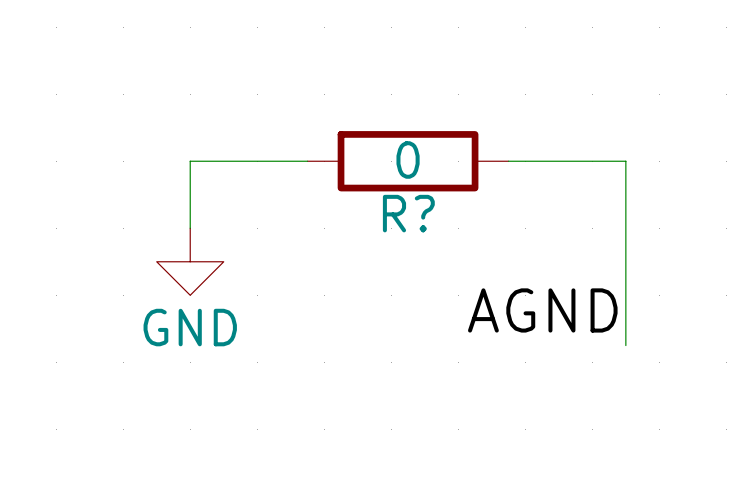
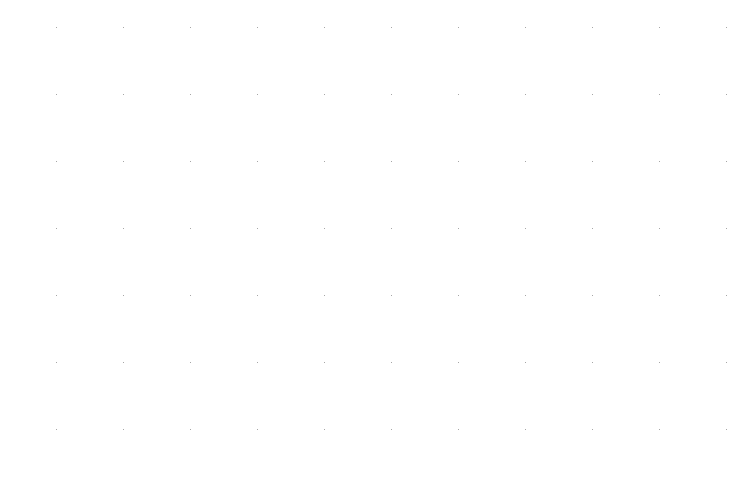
wire: (307, 161) (190, 161) (190, 228) -> none
R?: 0 (408, 161) -> none
wire: (508, 161) (625, 161) (625, 345) -> none
power symbol: GND (190, 261) -> none
label: AGND (542, 310) -> none

